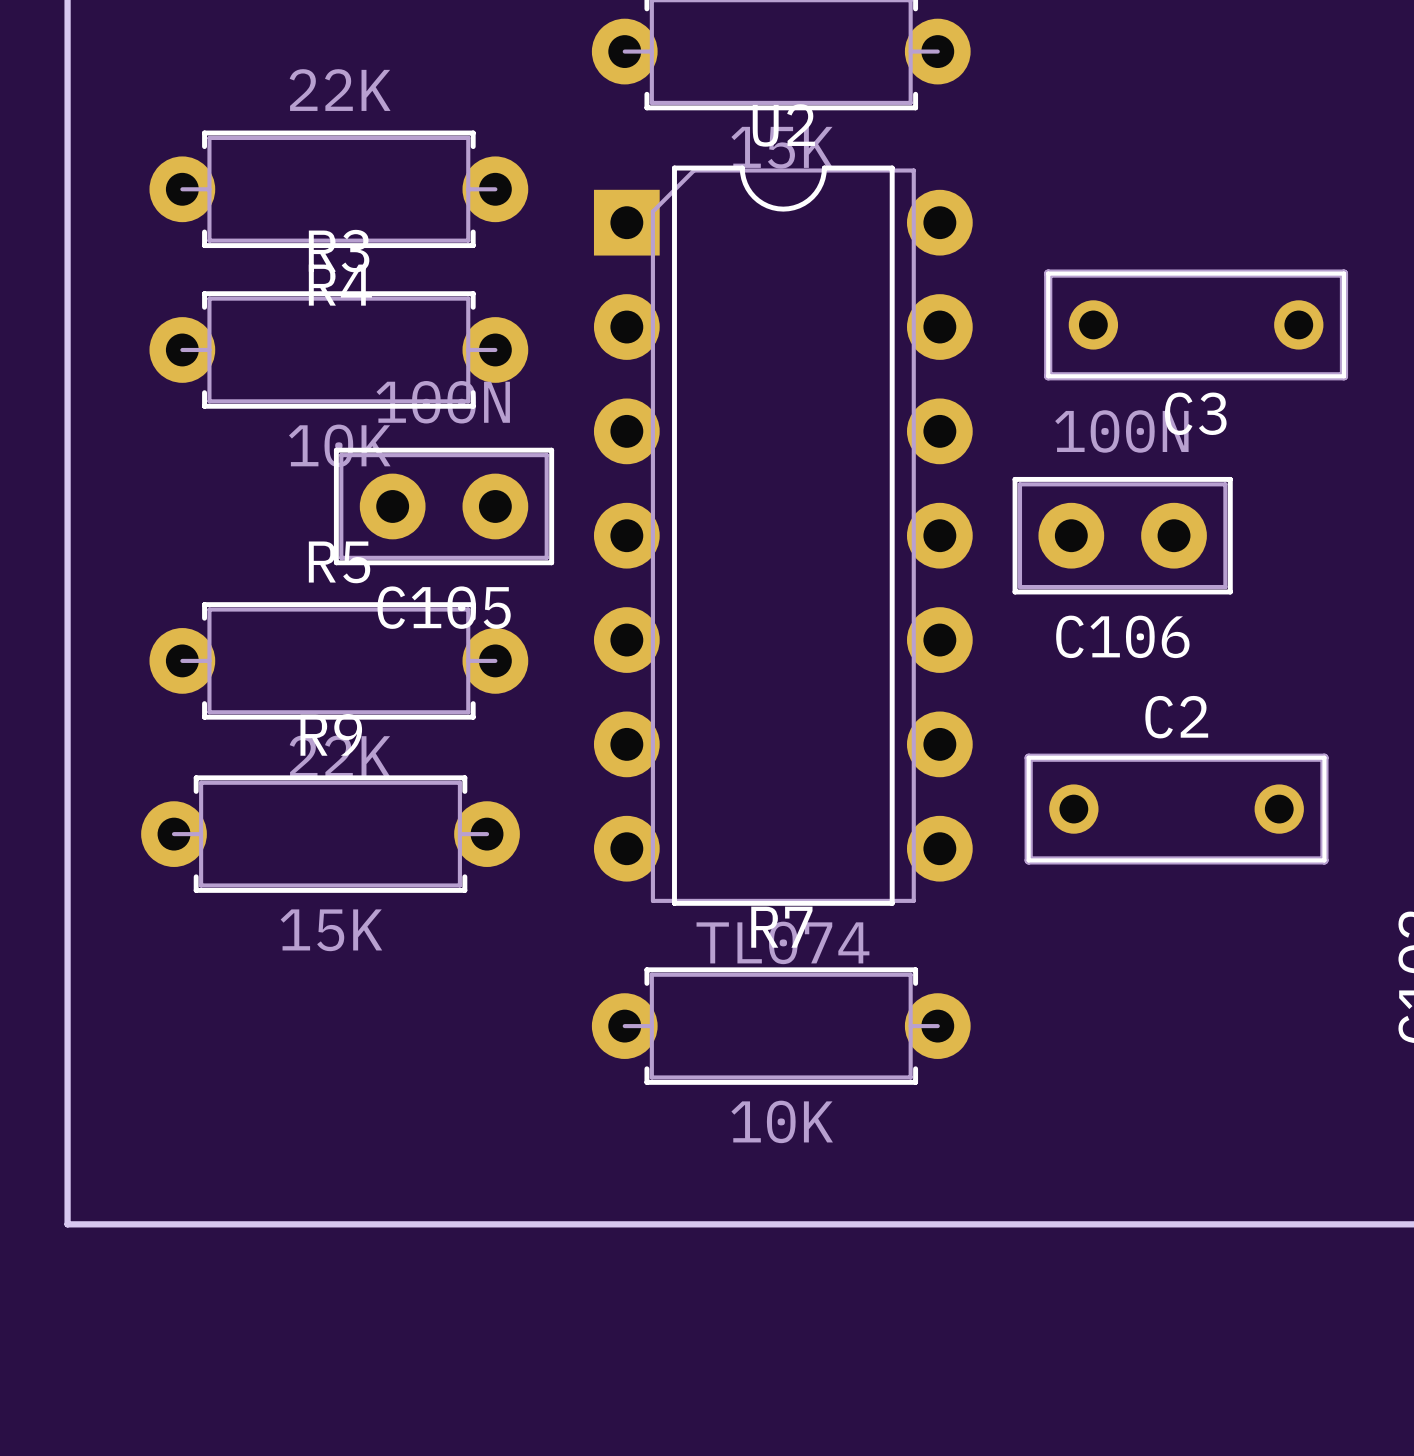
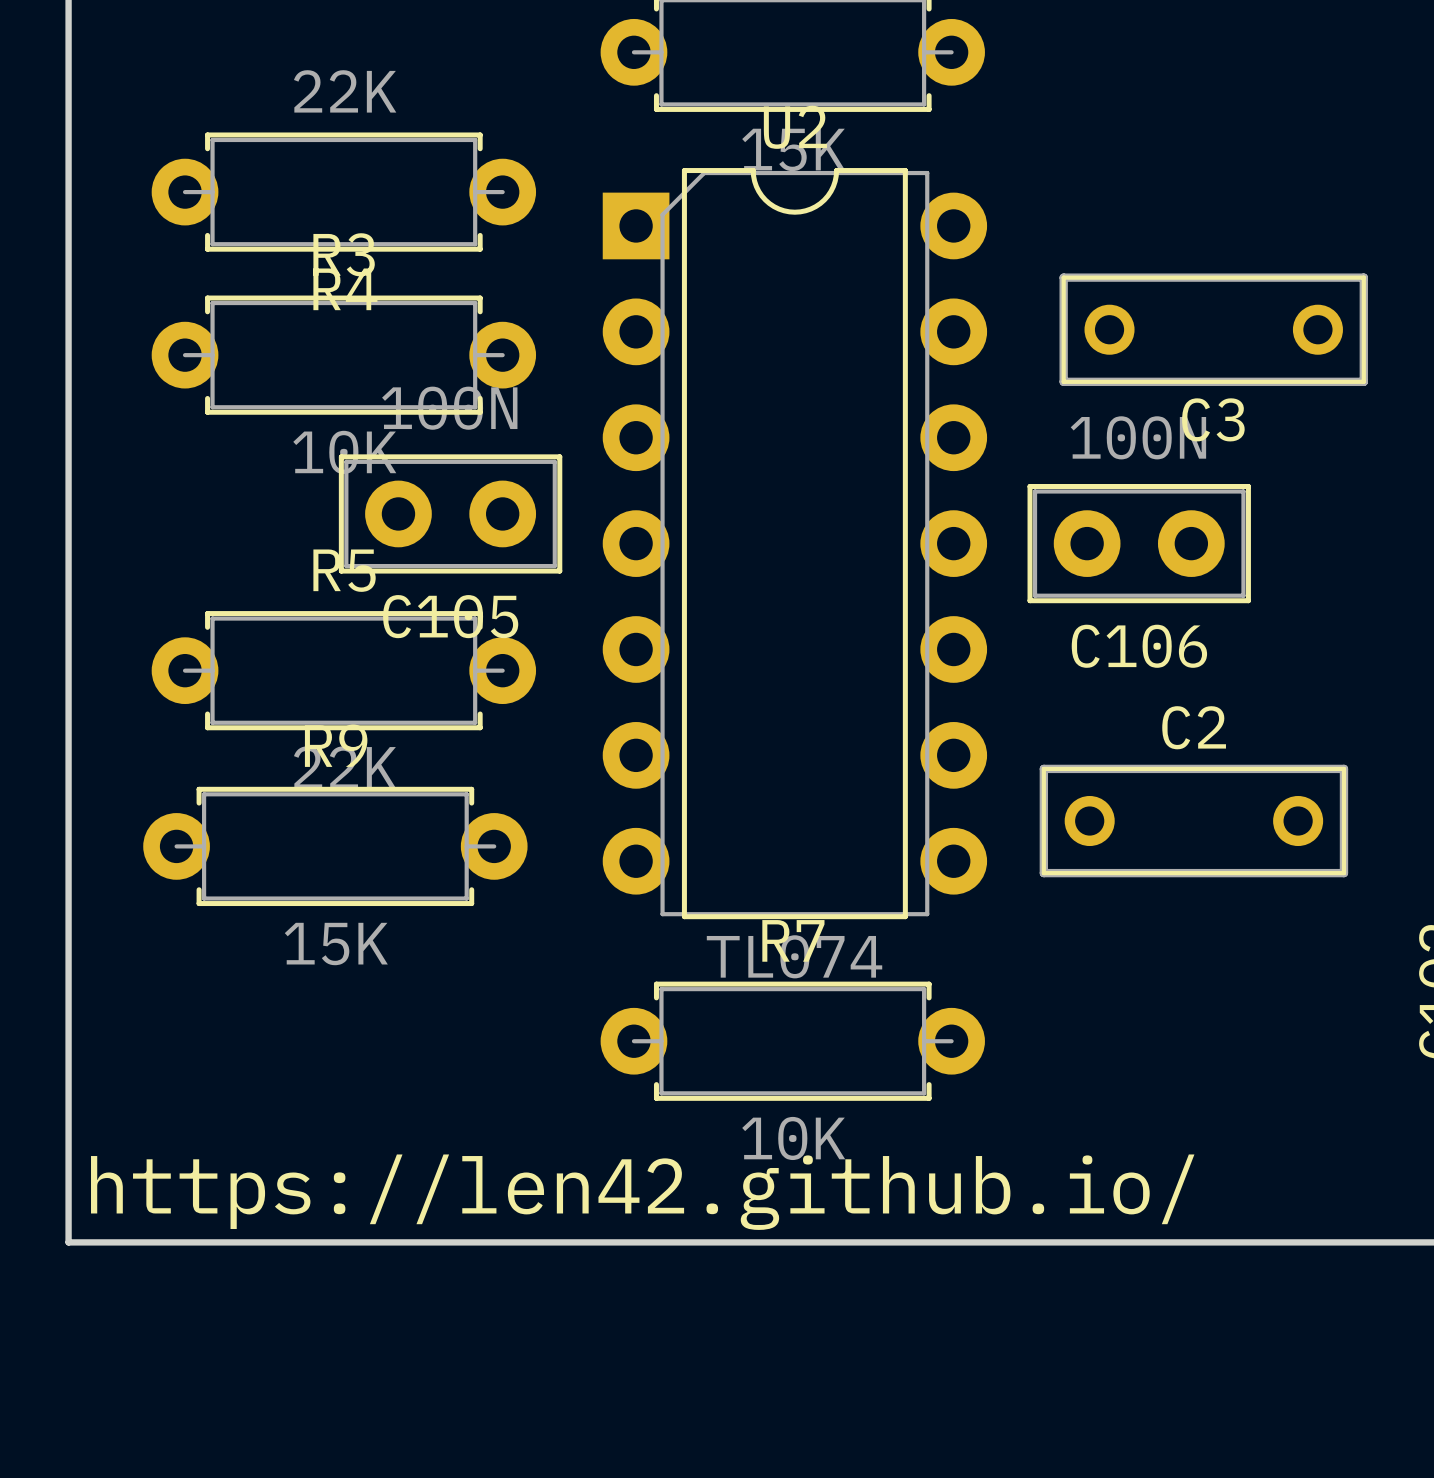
text: none -> https://len42.github.io/ (642, 1192)

